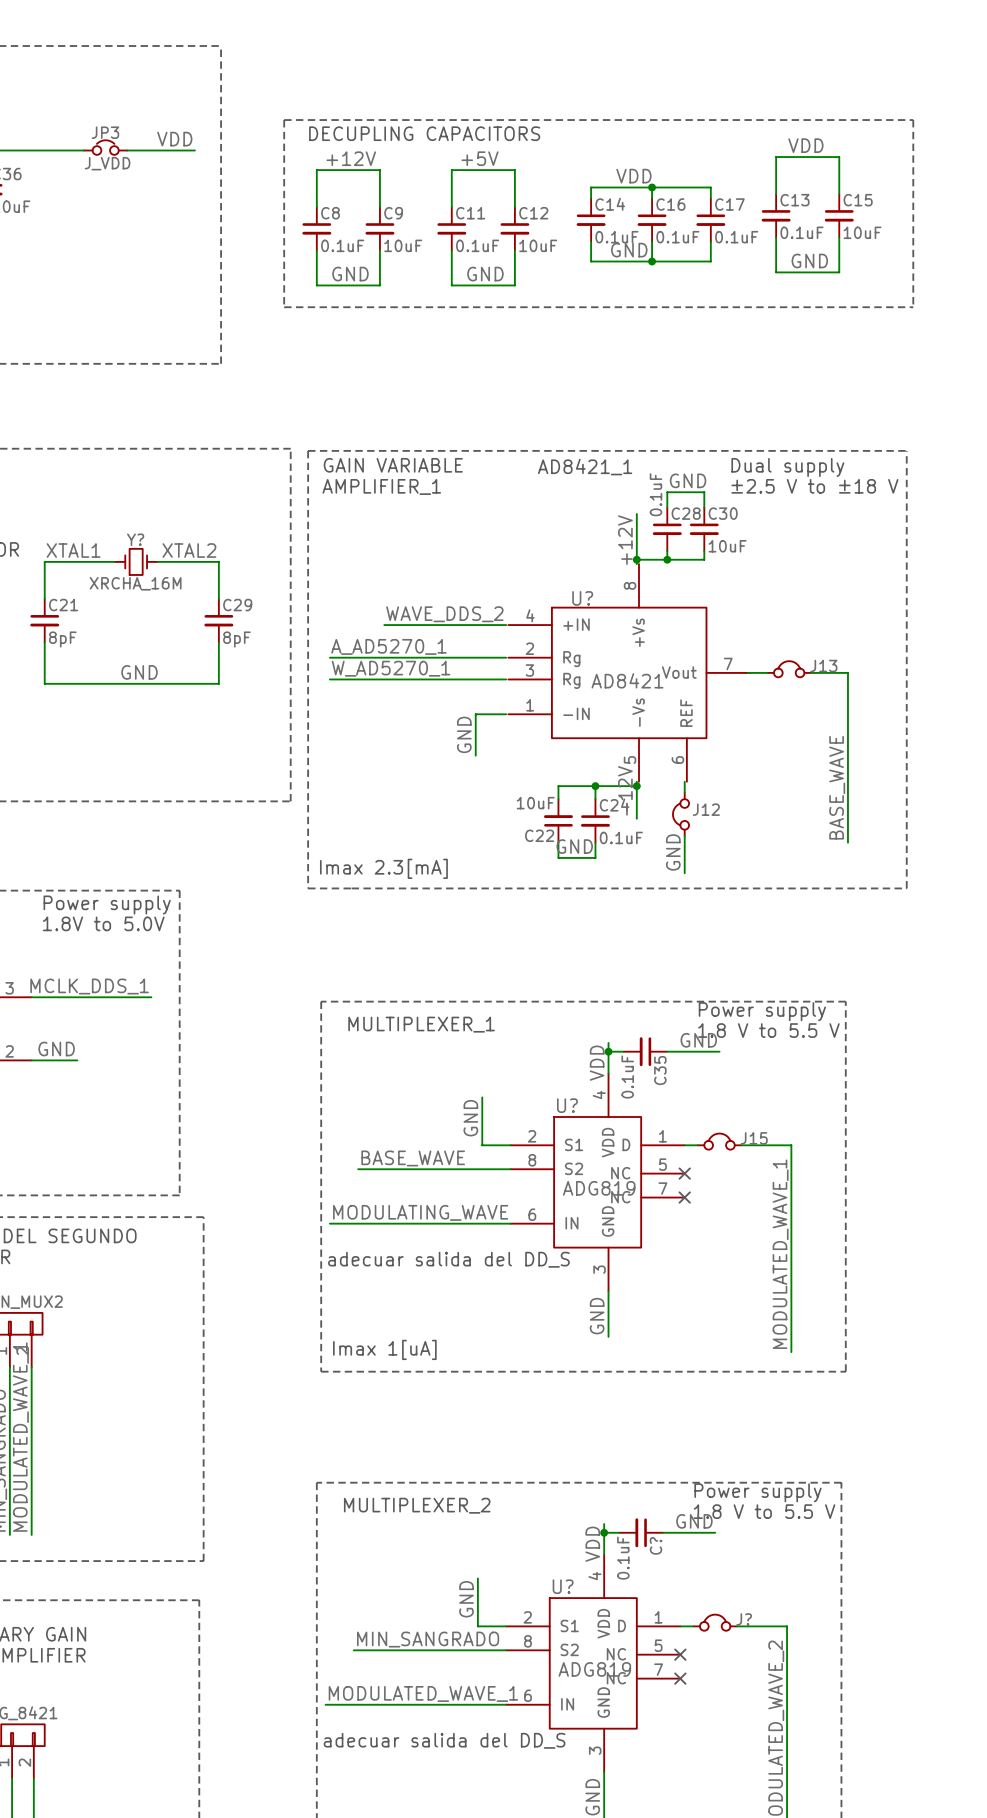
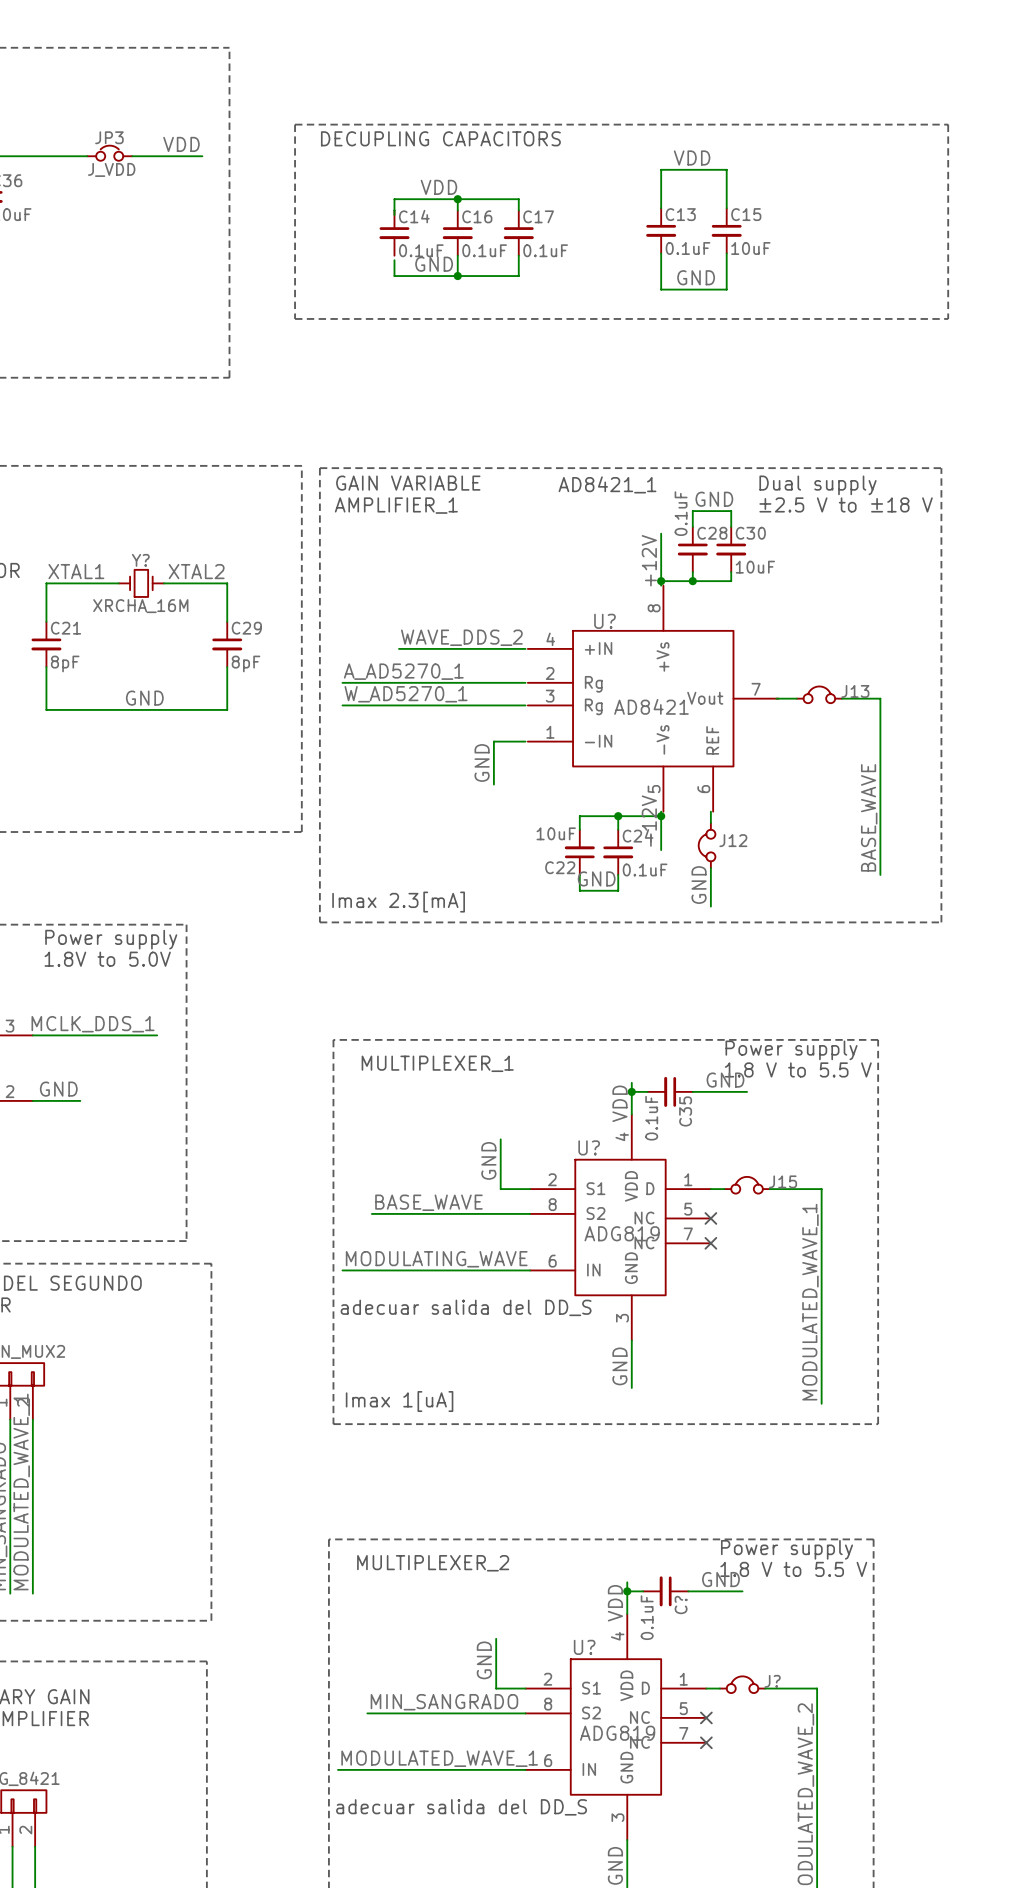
label: VDD (805, 145) -> none
label: +12V (351, 158) -> none
label: +5V (480, 158) -> none
label position: VDD (633, 176) -> VDD (692, 157)
label: none -> VDD (438, 187)
wire: (652, 187) (652, 198) -> (457, 199) (457, 210)
junction: (652, 187) -> none
wire: (379, 191) (379, 170) (316, 170) (316, 207) -> (394, 199) (518, 199) (518, 210)
junction: none -> (457, 199)
wire: (776, 194) (776, 157) (839, 157) (839, 194) -> (661, 208) (661, 169) (726, 169) (726, 208)
wire: (591, 198) (591, 187) (710, 187) (710, 198) -> none
wire: (451, 207) (451, 170) (514, 170) (514, 207) -> none
C13 position: (776, 215) -> (661, 230)
C15 position: (839, 215) -> (726, 230)
C14 position: (591, 220) -> (394, 233)
C16 position: (652, 220) -> (457, 233)
C17 position: (710, 220) -> (518, 233)
C8: 0.1uF (316, 228) -> none
C9: 10uF (379, 228) -> none
C11: 0.1uF (451, 228) -> none
C12: 10uF (514, 228) -> none
wire: (776, 237) (776, 272) (839, 272) (839, 237) -> (661, 253) (661, 289) (726, 289) (726, 253)
wire: (591, 241) (591, 261) (710, 261) (710, 241) -> none
wire: (652, 241) (652, 261) -> (457, 255) (457, 276)
wire: (316, 250) (316, 285) (379, 285) (379, 265) -> (518, 255) (518, 276) (394, 276)
wire: (451, 250) (451, 285) (514, 285) (514, 250) -> none
label position: GND (629, 250) -> GND (696, 277)
junction: (652, 261) -> none
label: GND (809, 261) -> none
junction: none -> (457, 276)
label position: GND (350, 274) -> GND (434, 264)
label: GND (485, 274) -> none

